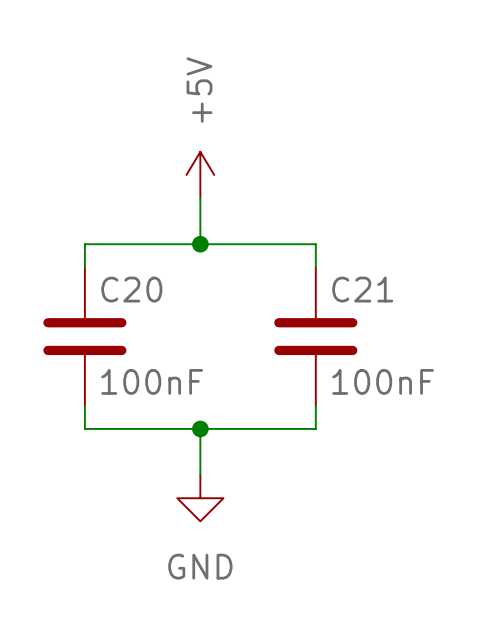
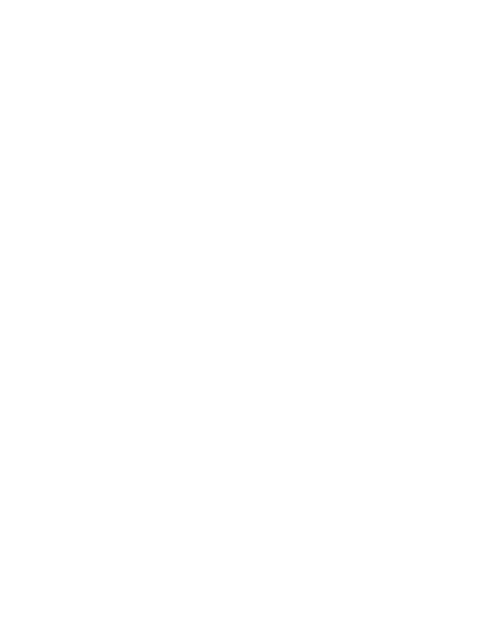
power symbol: +5V (200, 174) -> none
wire: (200, 198) (200, 244) -> none
junction: (200, 244) -> none
wire: (84, 267) (84, 244) (315, 244) (315, 267) -> none
C20: 100nF (84, 336) -> none
C21: 100nF (315, 336) -> none
wire: (84, 405) (84, 428) (315, 428) (315, 405) -> none
wire: (200, 428) (200, 475) -> none
junction: (200, 428) -> none
power symbol: GND (200, 498) -> none

